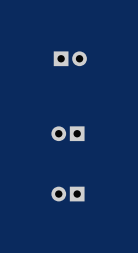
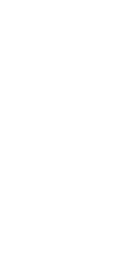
part: (70, 58) -> none
part: (67, 133) -> none
part: (67, 194) -> none

